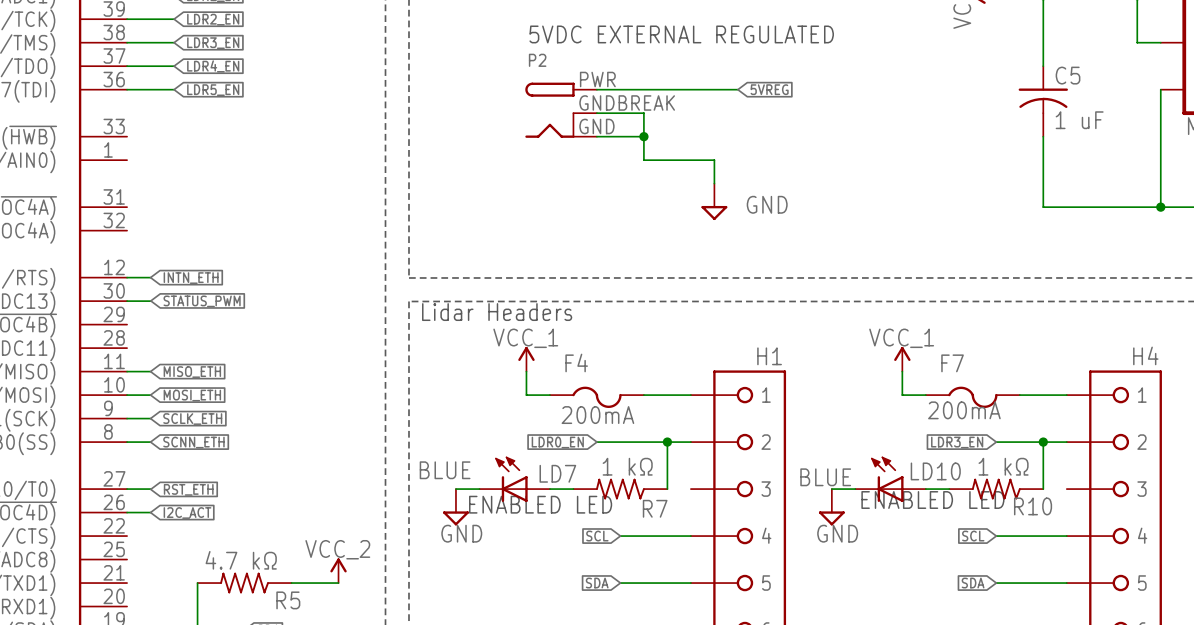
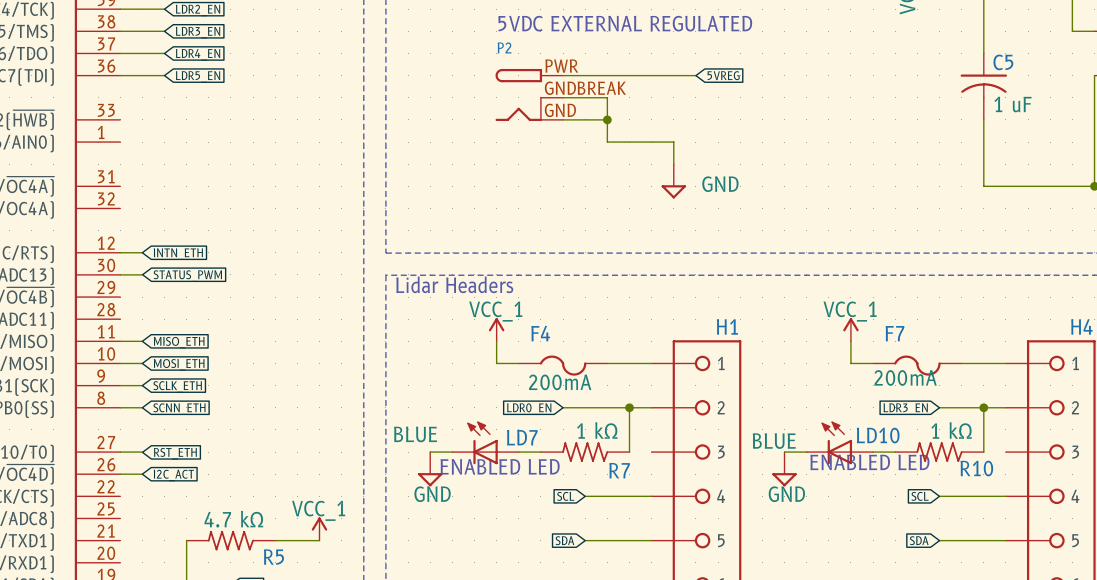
power symbol: VCC_2 (338, 570) -> VCC_1 (319, 529)

